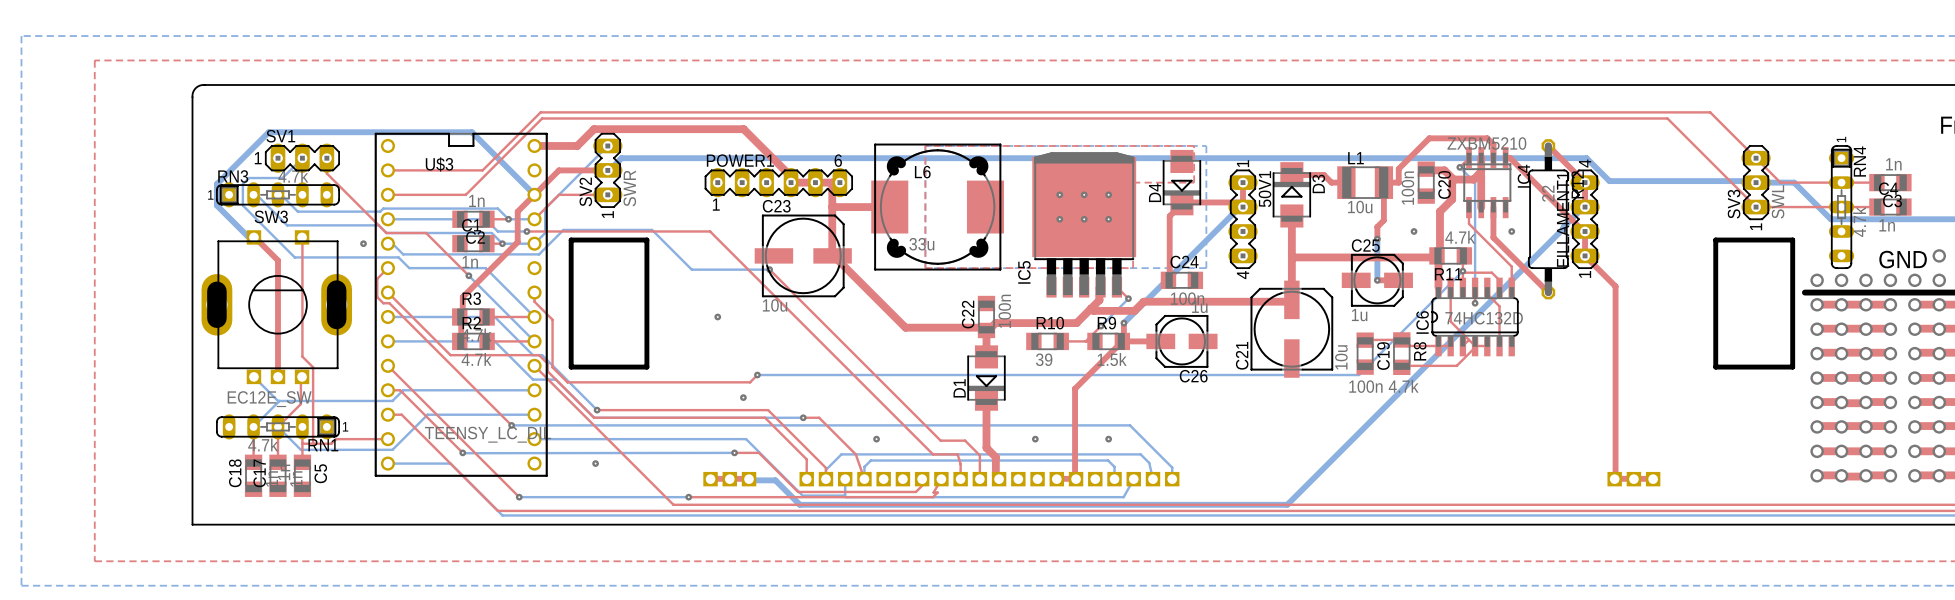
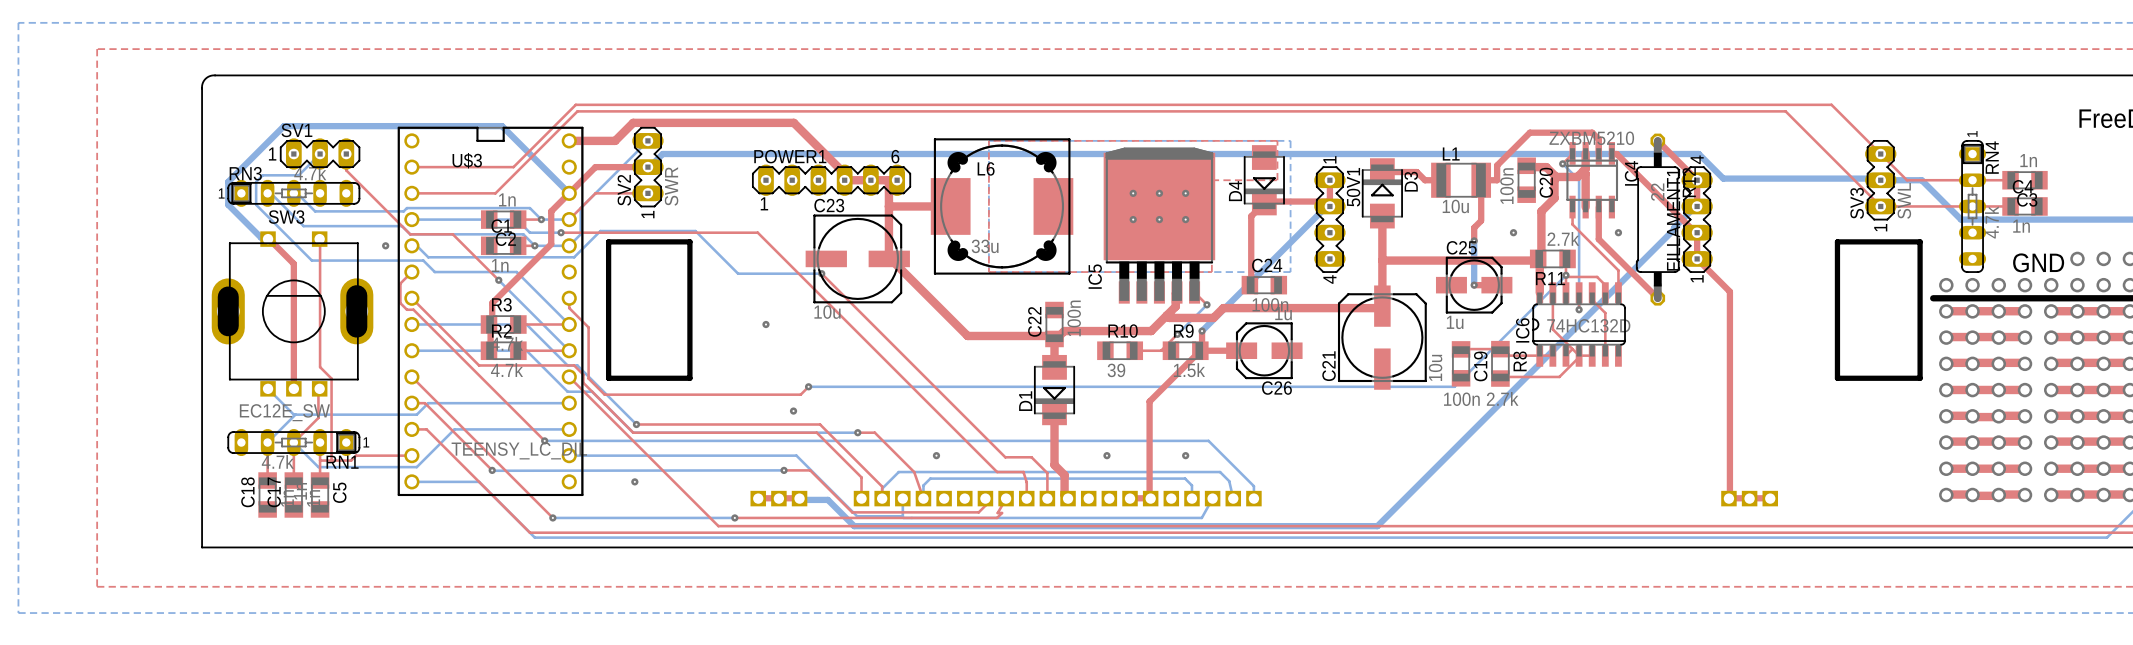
R11 value: 4.7k (1460, 237) -> 2.7k (1563, 238)
R8 value: 4.7k (1403, 386) -> 2.7k (1502, 398)

